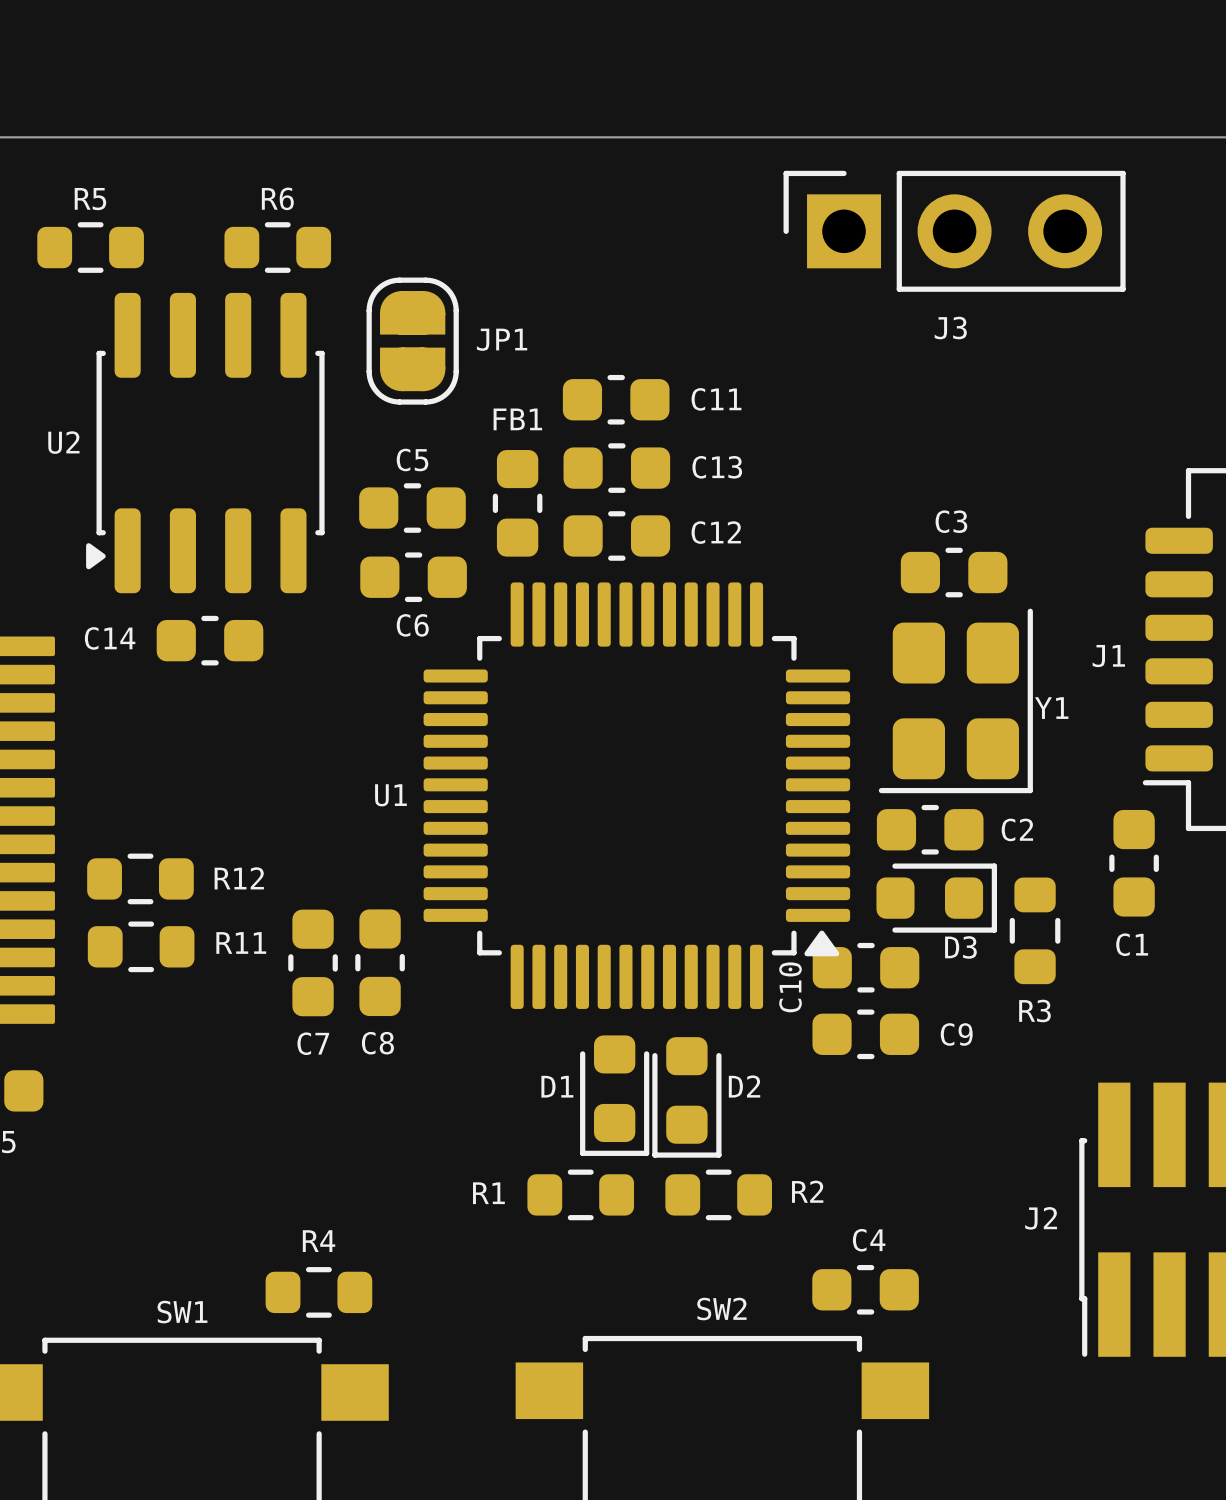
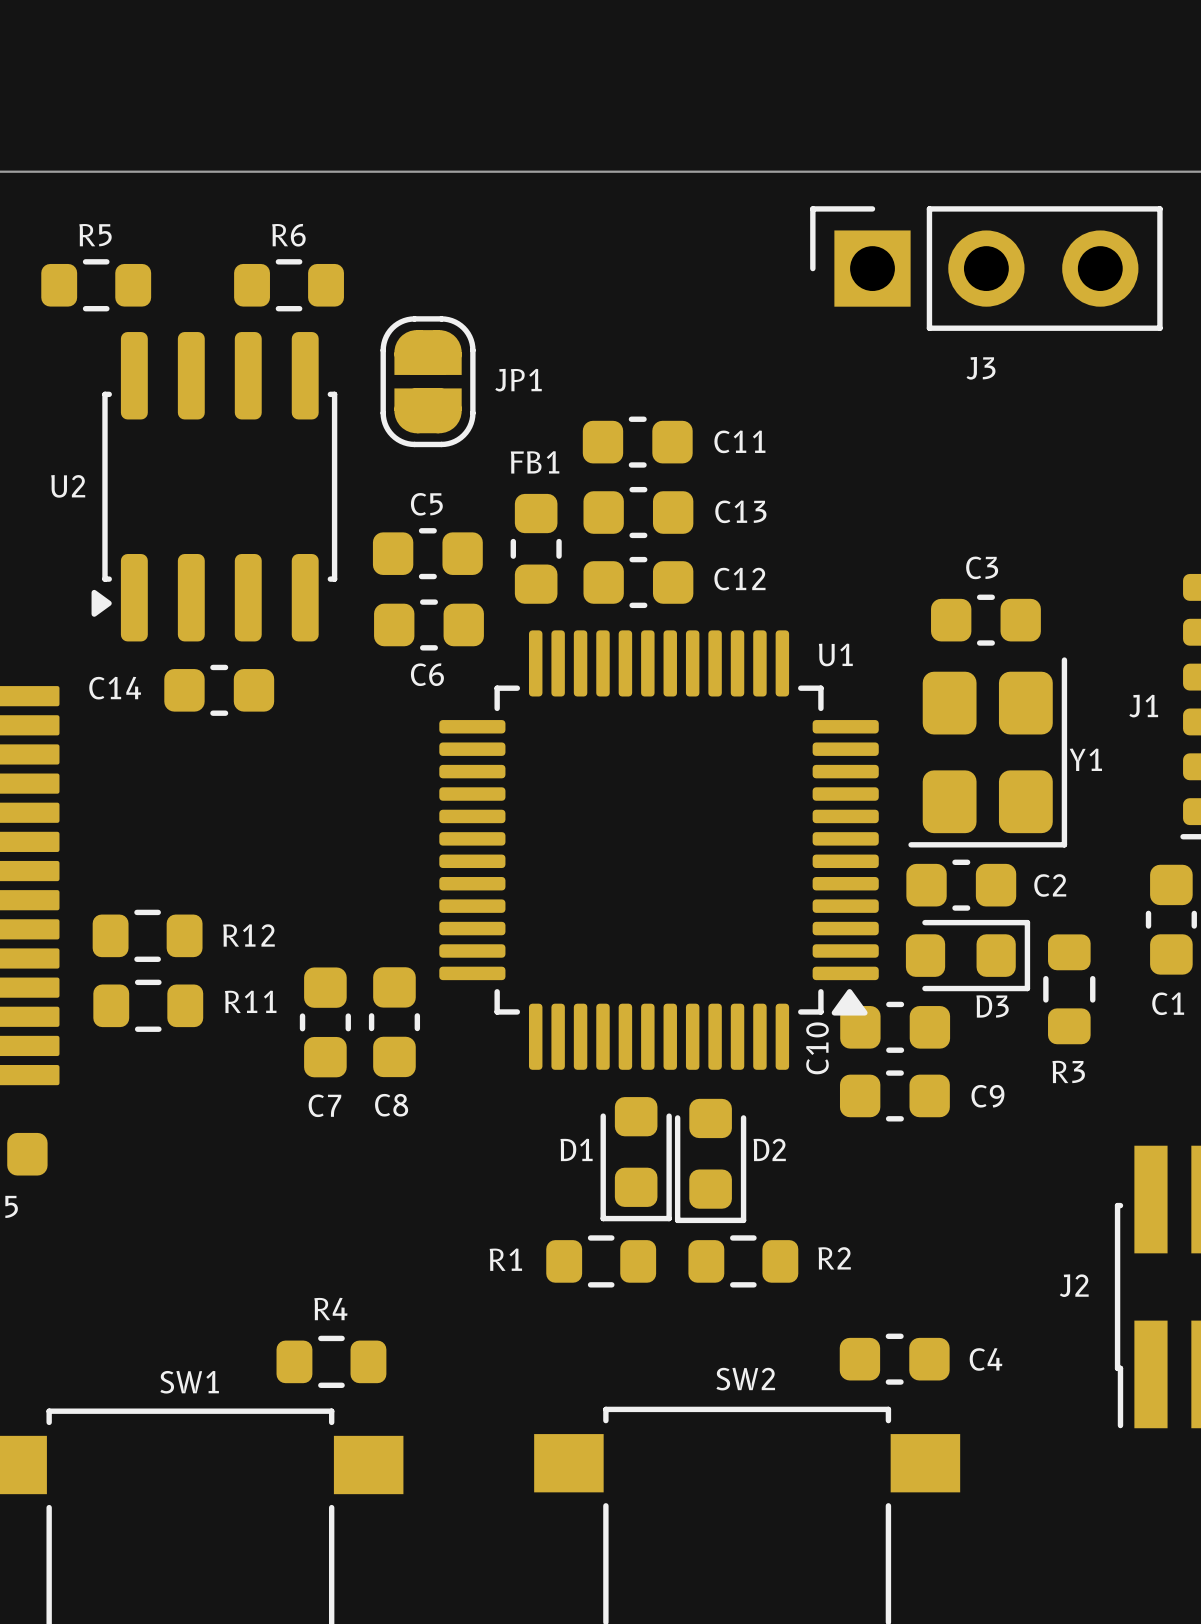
U1 name position: U1 (390, 795) -> U1 (835, 654)
C4 name position: C4 (869, 1240) -> C4 (985, 1359)

